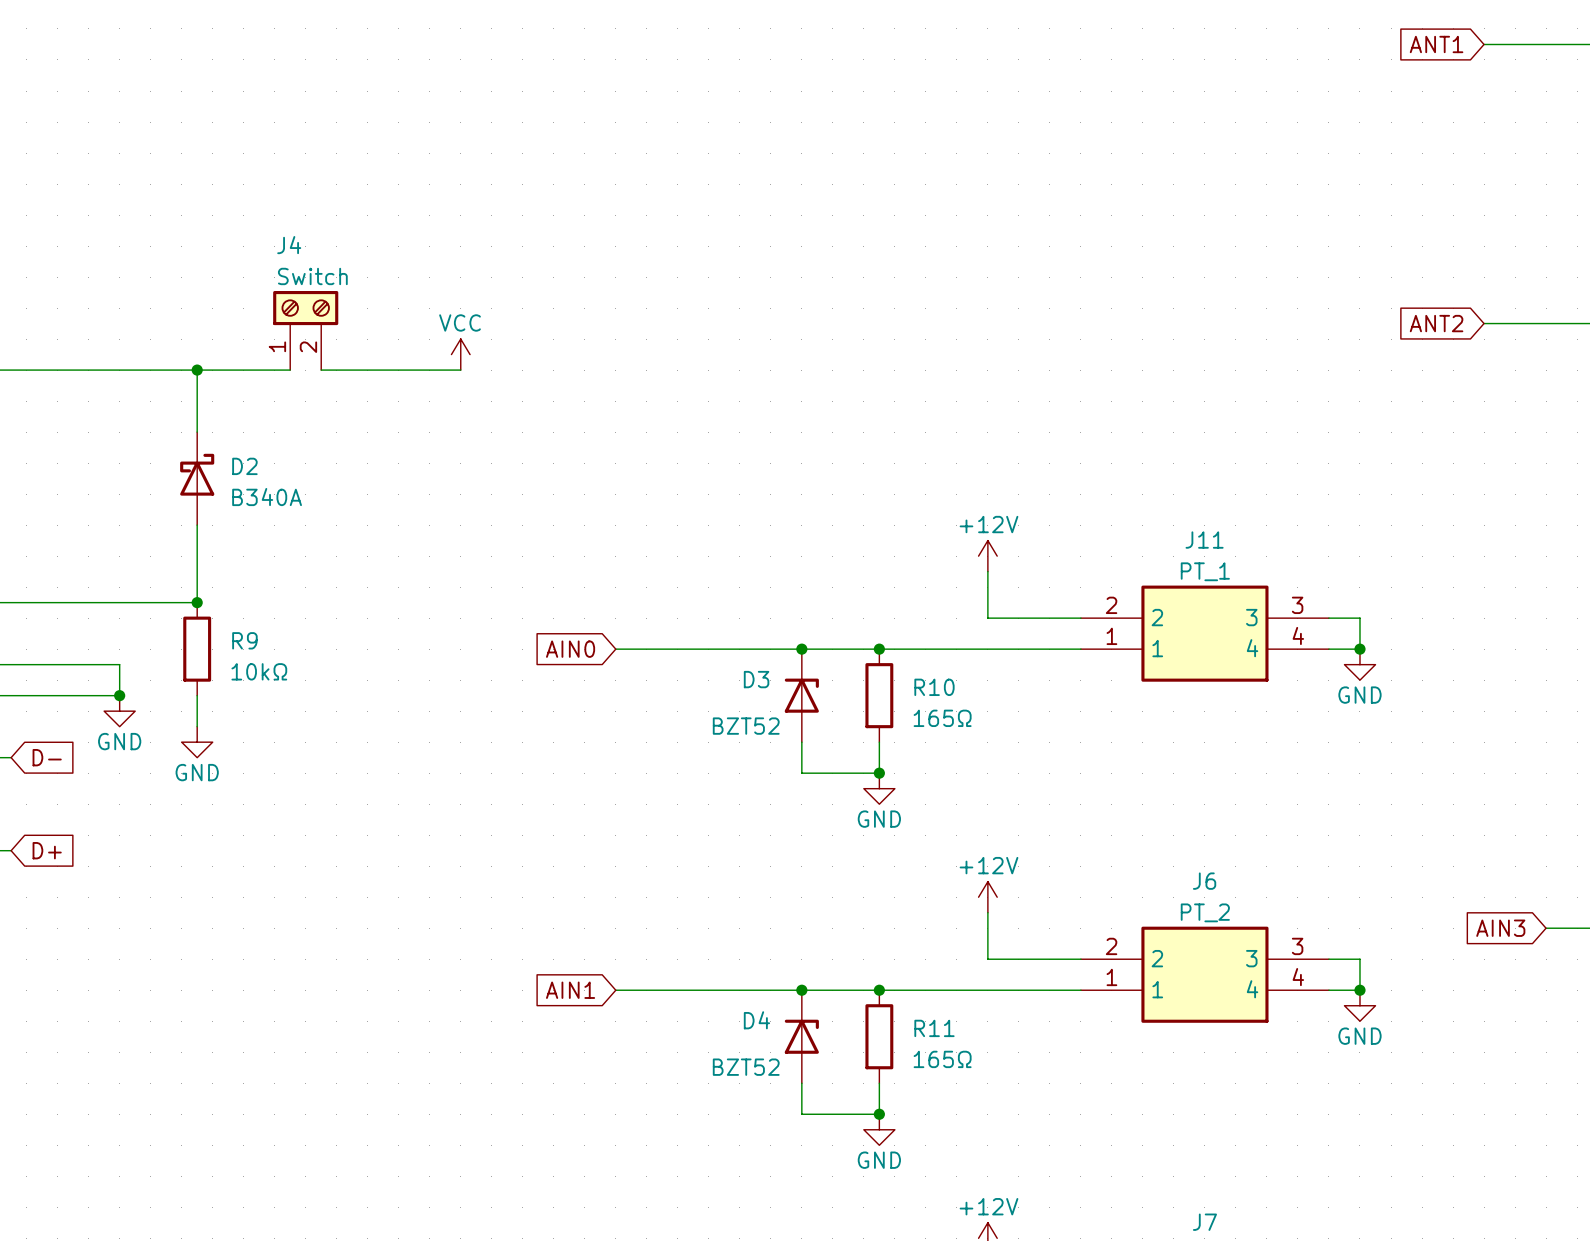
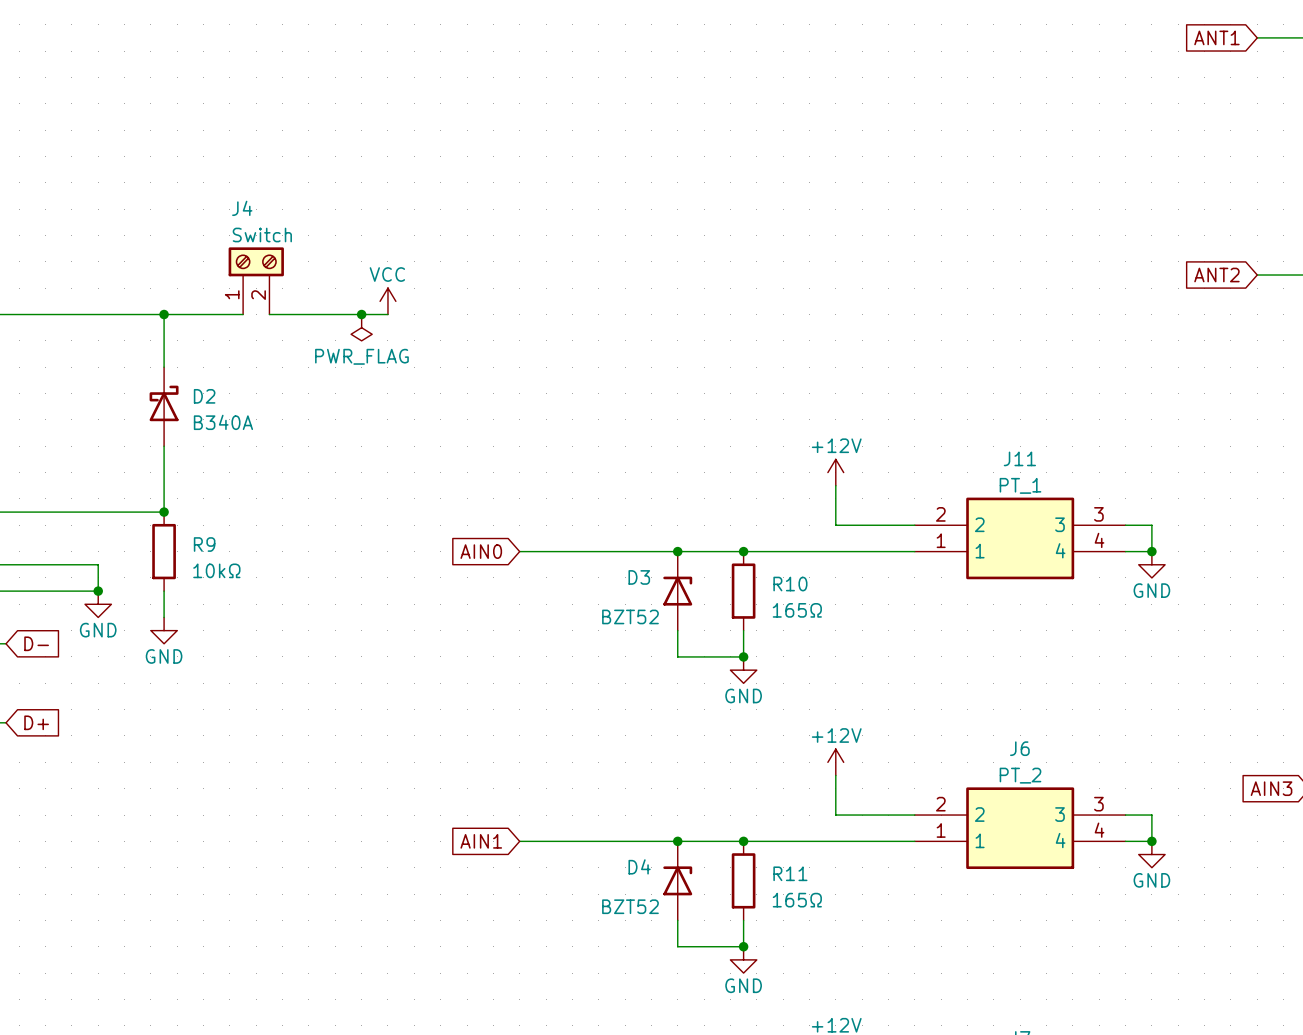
junction: none -> (361, 314)
power symbol: none -> PWR_FLAG (361, 327)

